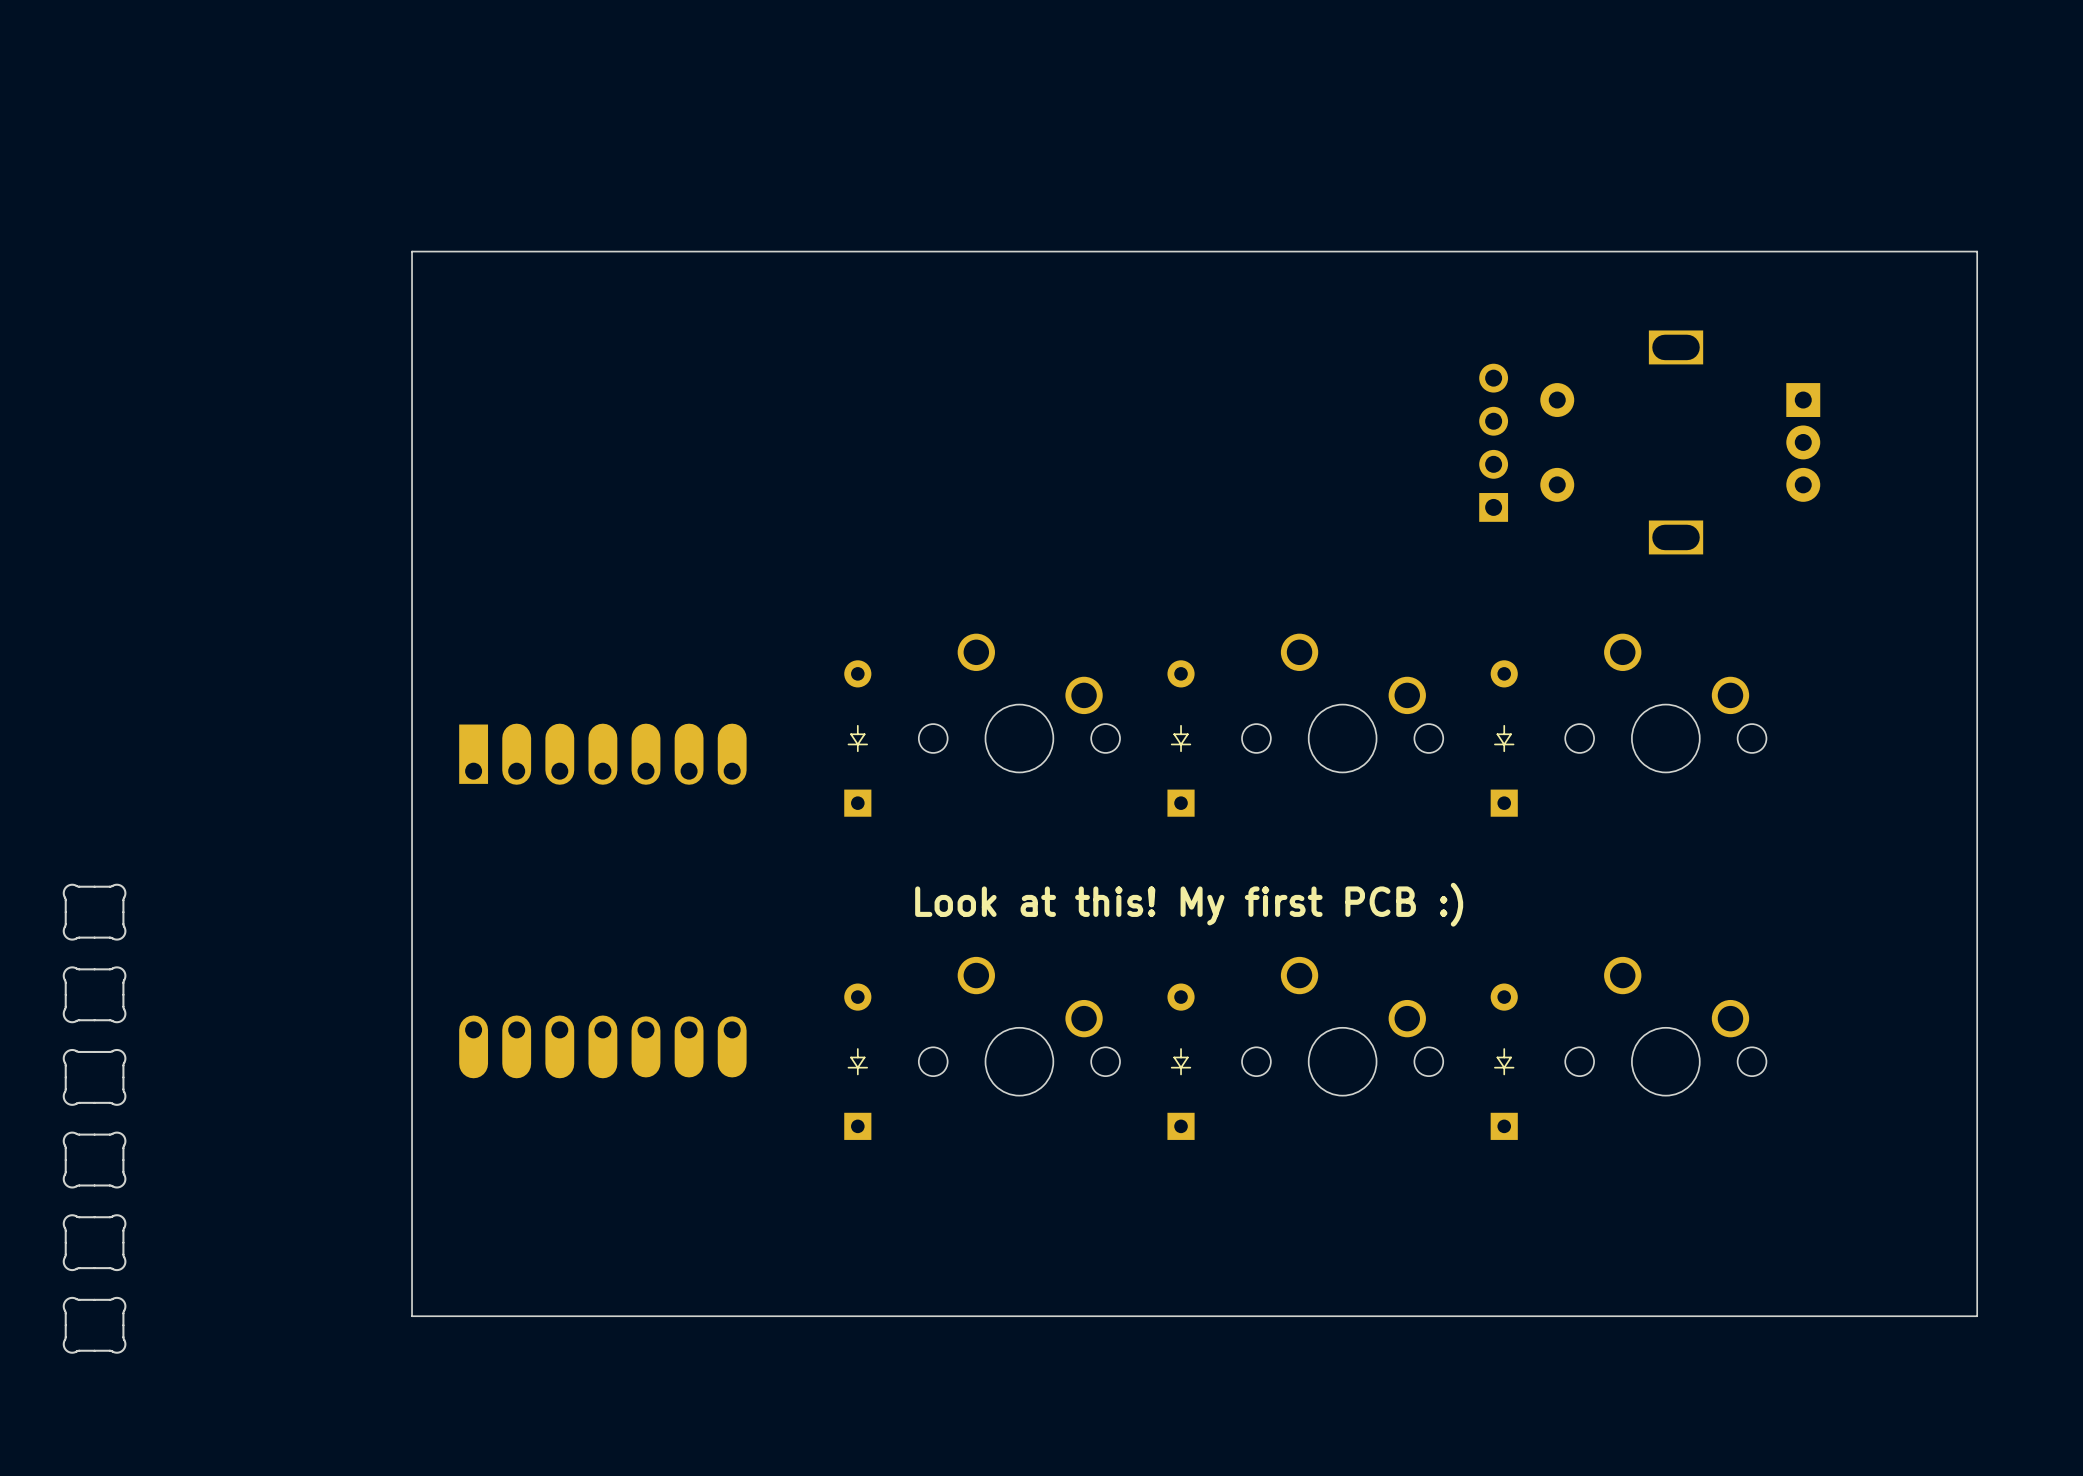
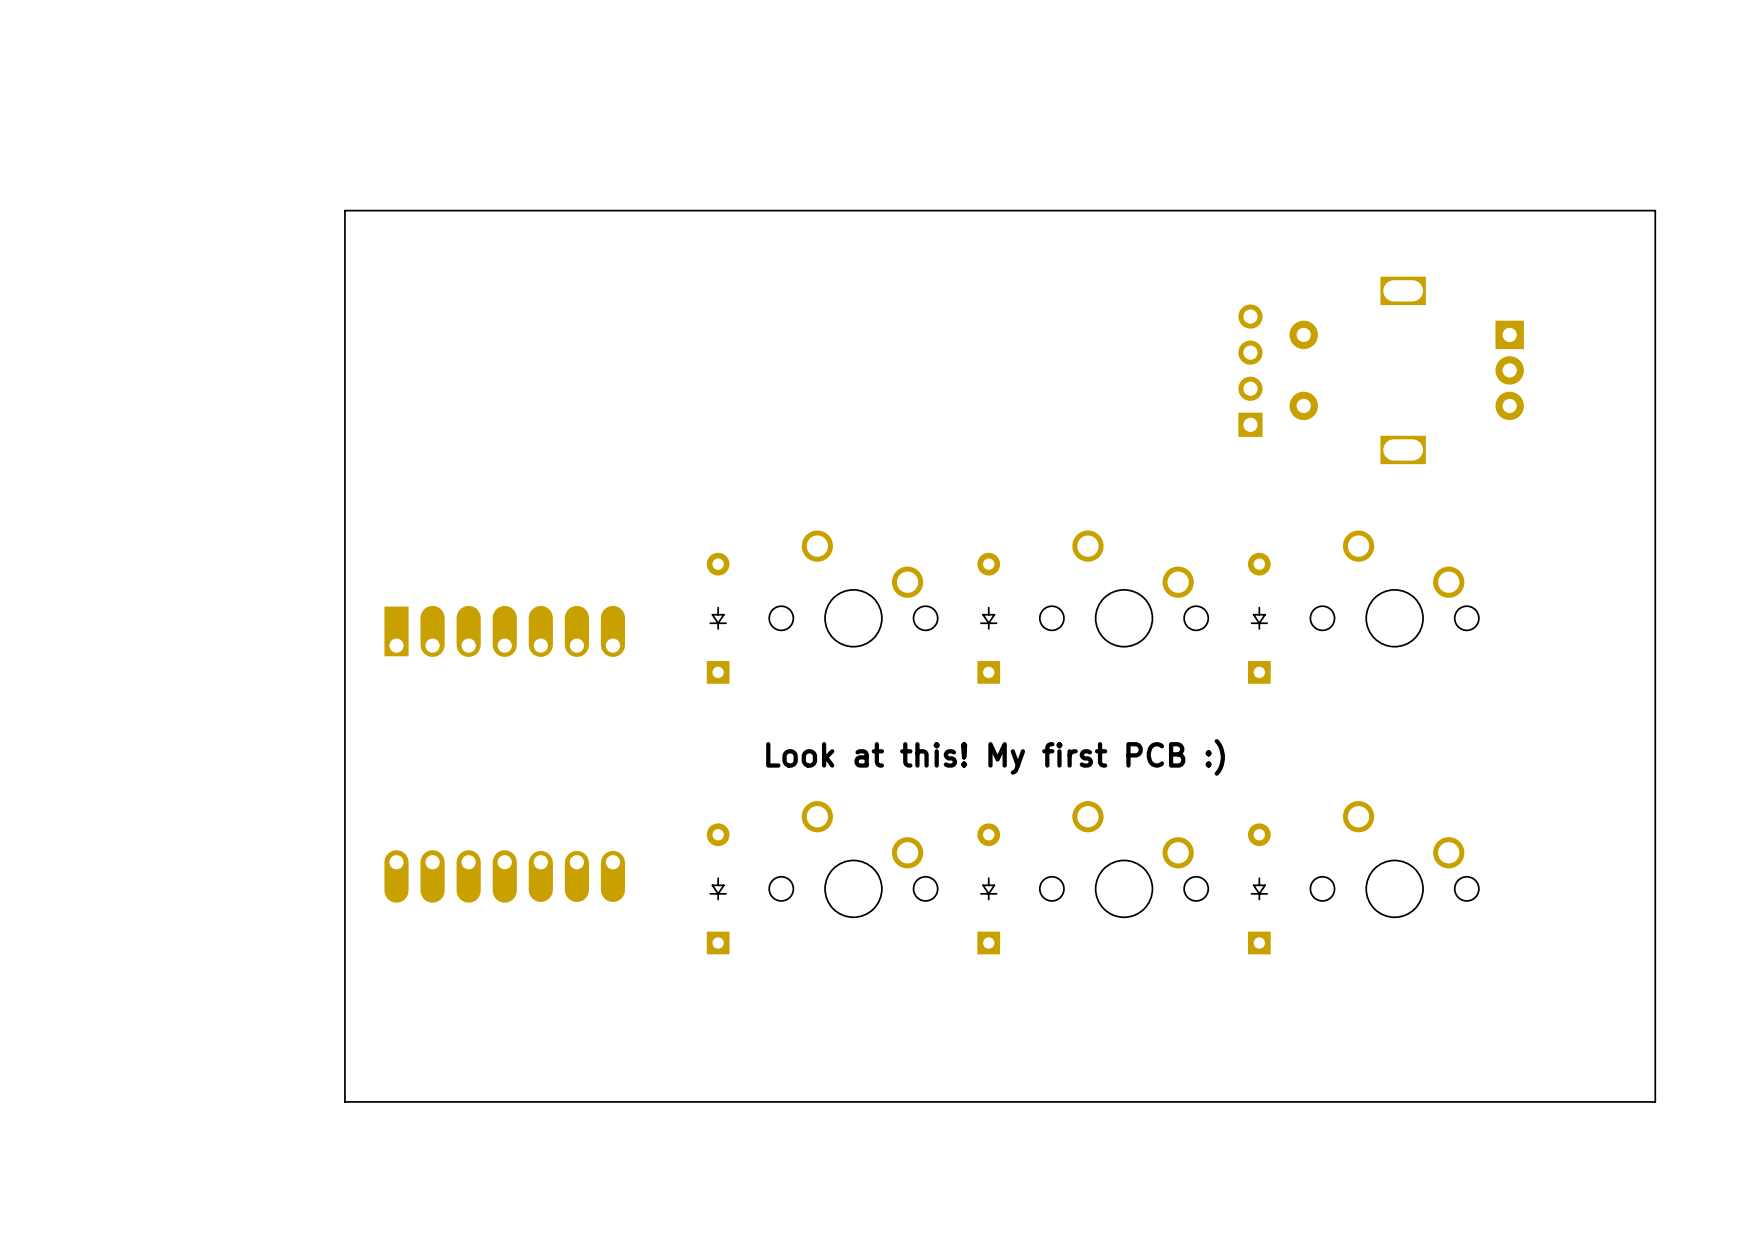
part: (94, 912) -> none
part: (94, 994) -> none
part: (94, 1077) -> none
part: (94, 1160) -> none
part: (94, 1242) -> none
part: (94, 1325) -> none

